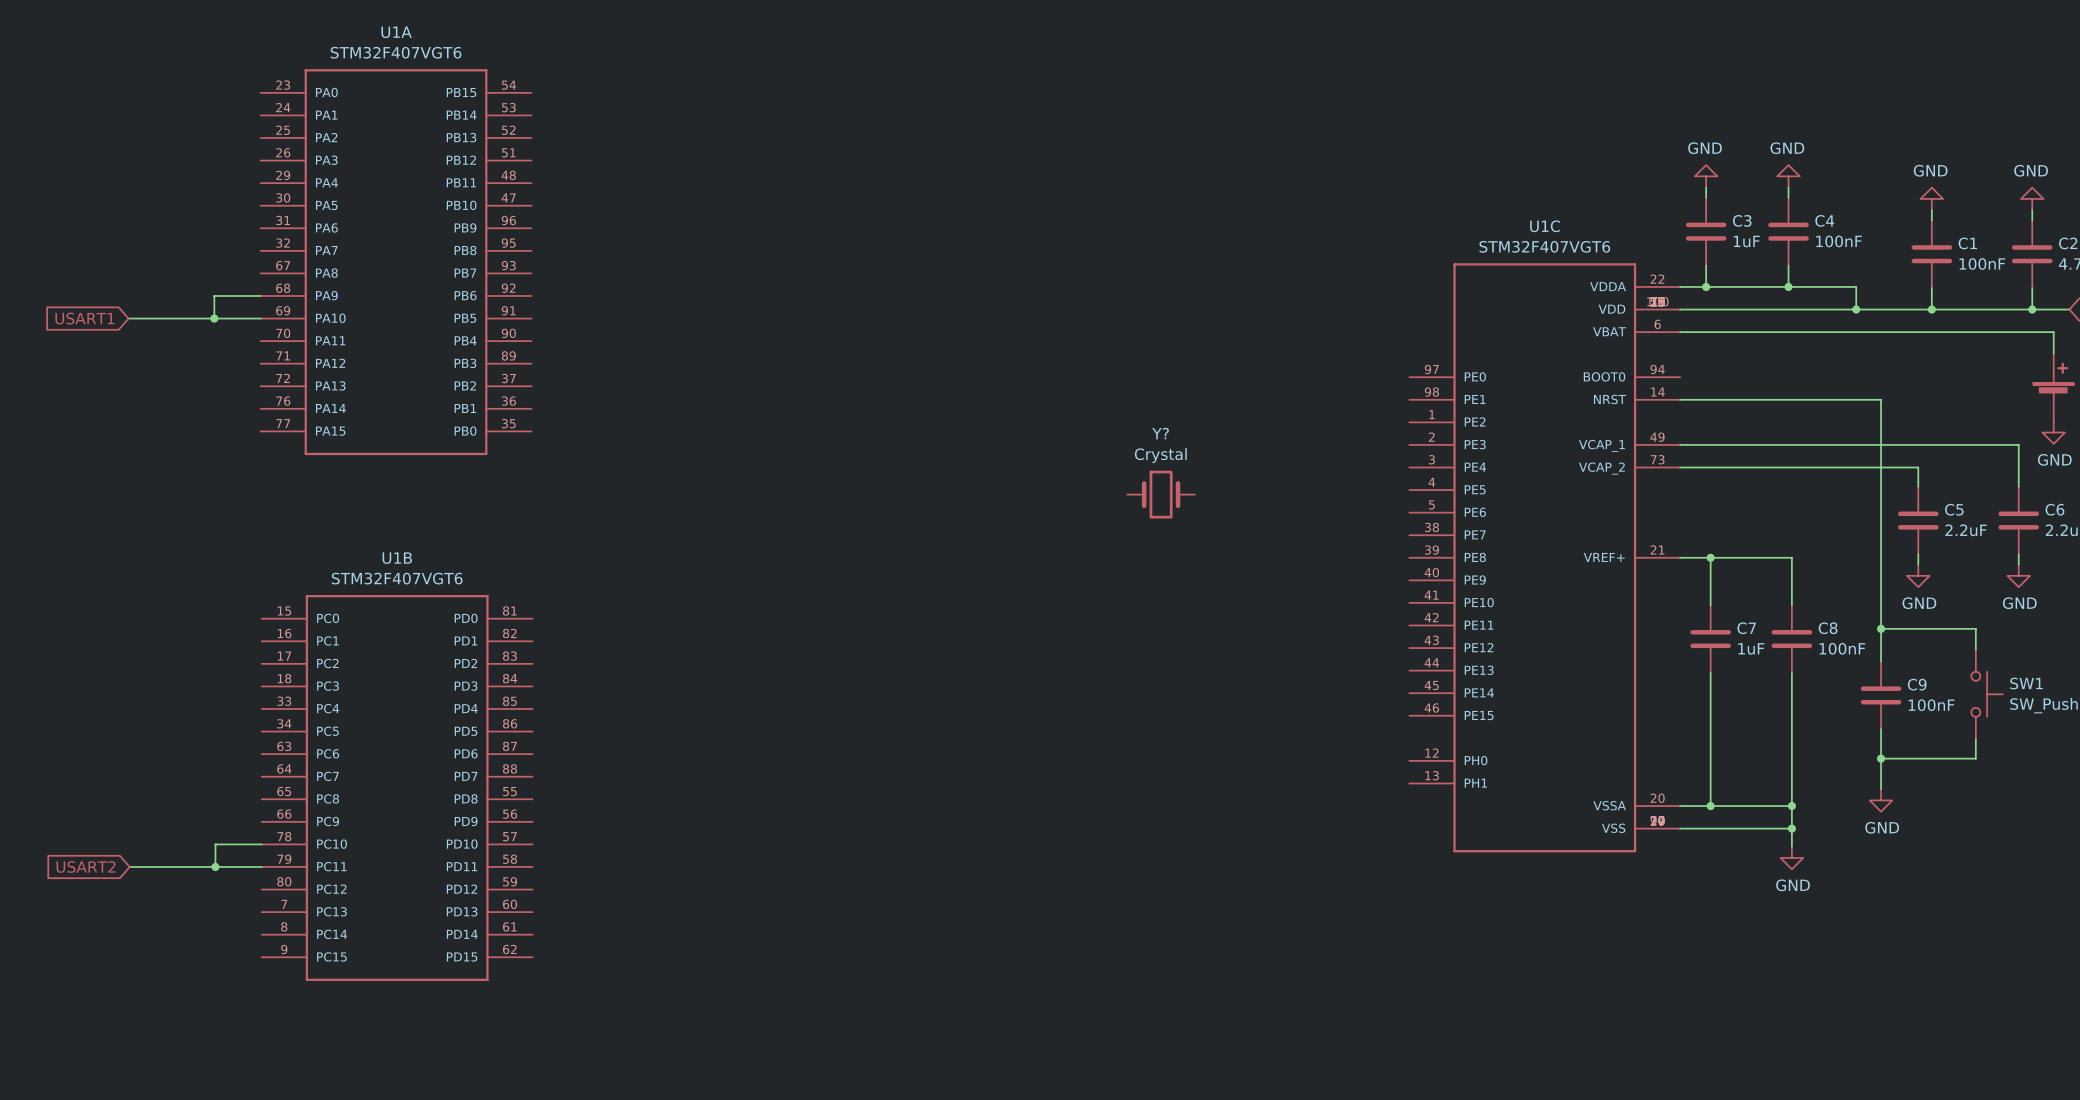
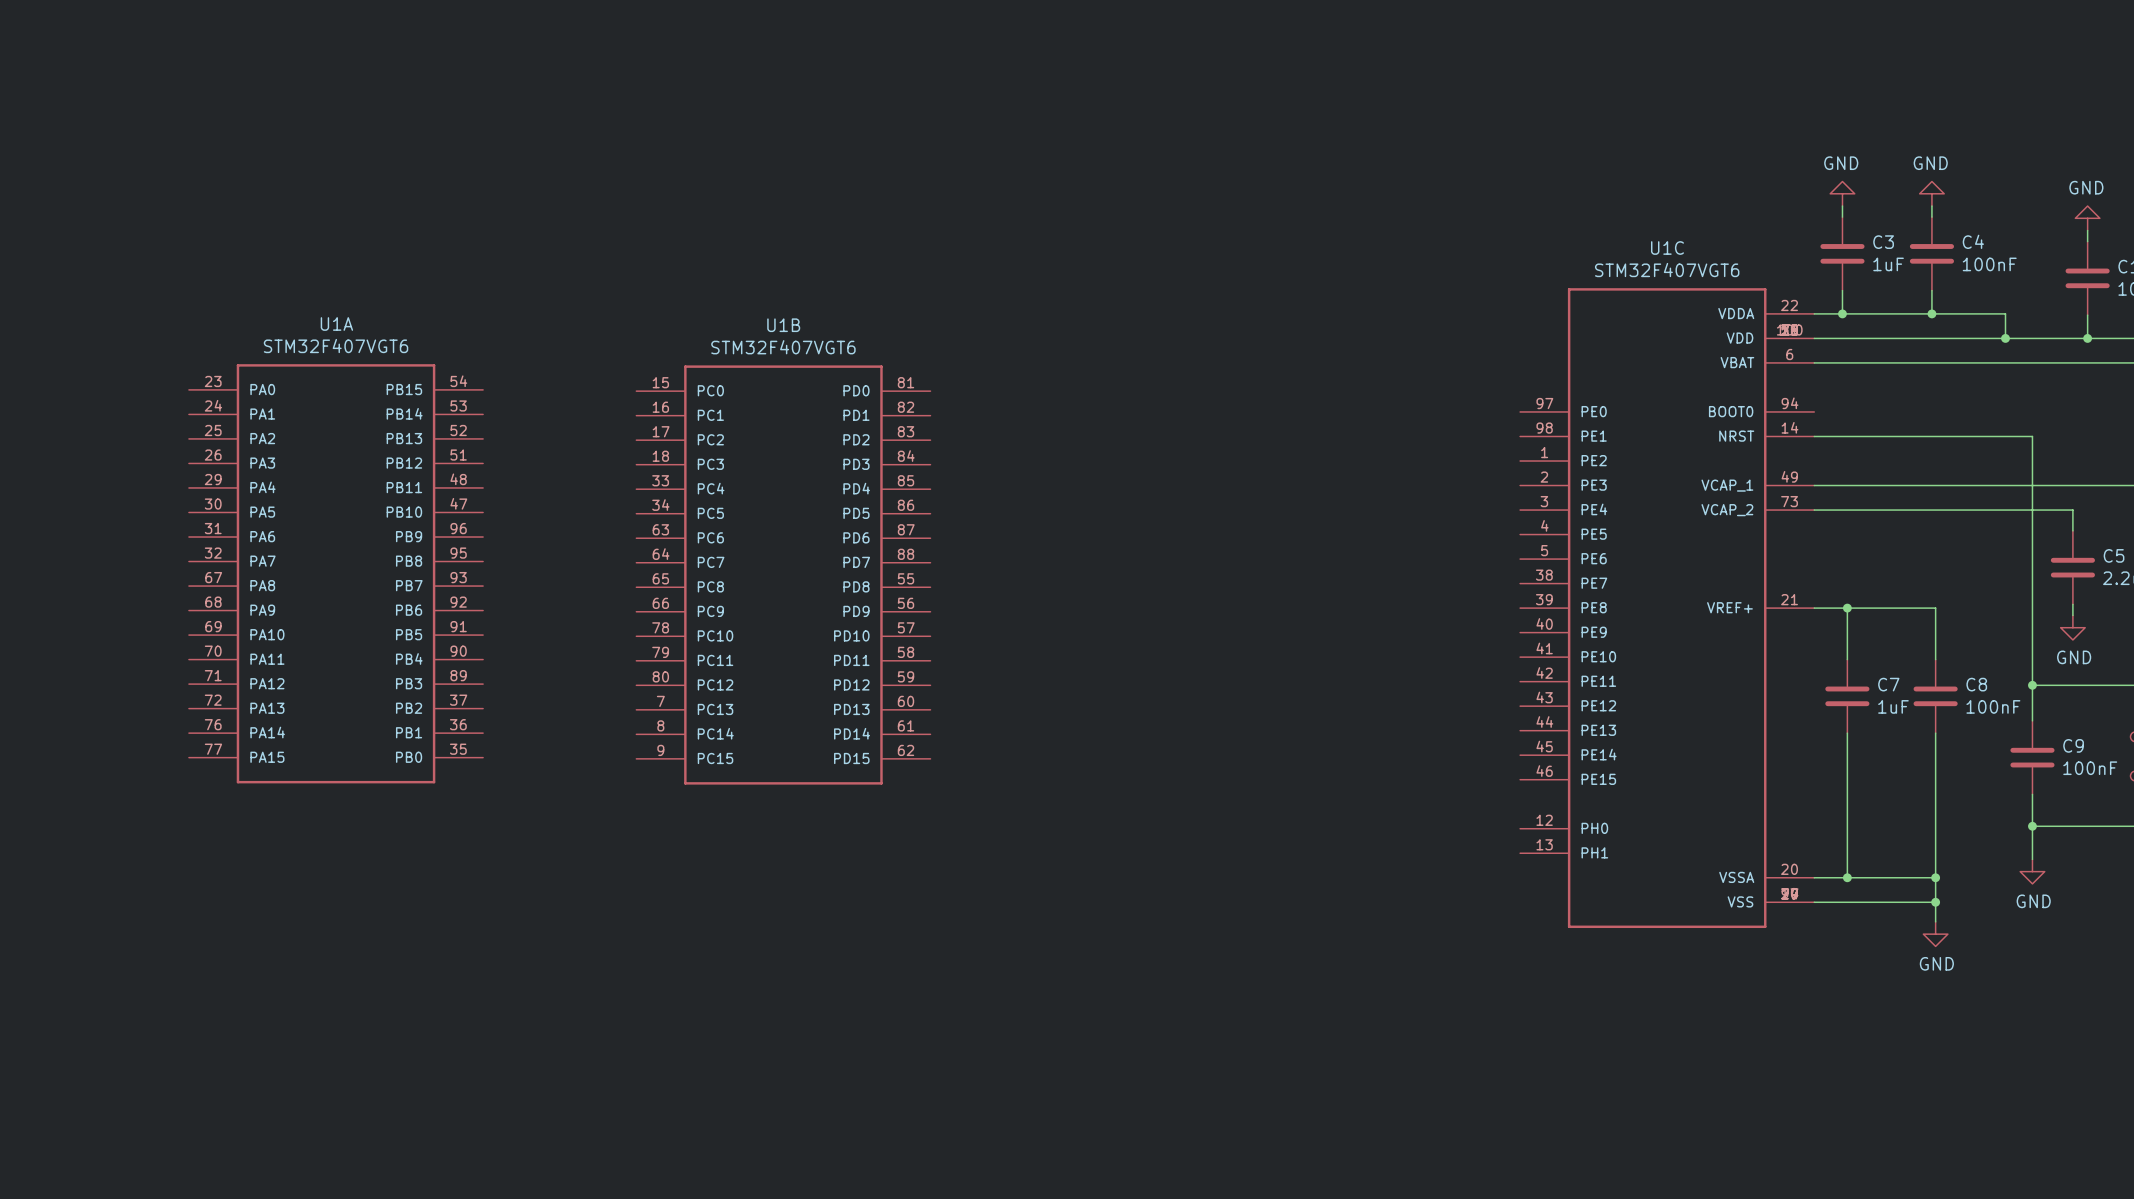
U1A position: (396, 262) -> (336, 573)
wire: (260, 295) (214, 295) (214, 318) -> none
global label: USART1 (84, 318) -> none
wire: (128, 318) (260, 318) -> none
junction: (214, 318) -> none
Y?: Crystal (1161, 494) -> none
U1B position: (397, 787) -> (783, 575)
wire: (261, 844) (215, 844) (215, 866) -> none
global label: USART2 (86, 866) -> none
wire: (129, 866) (261, 866) -> none
junction: (215, 866) -> none

